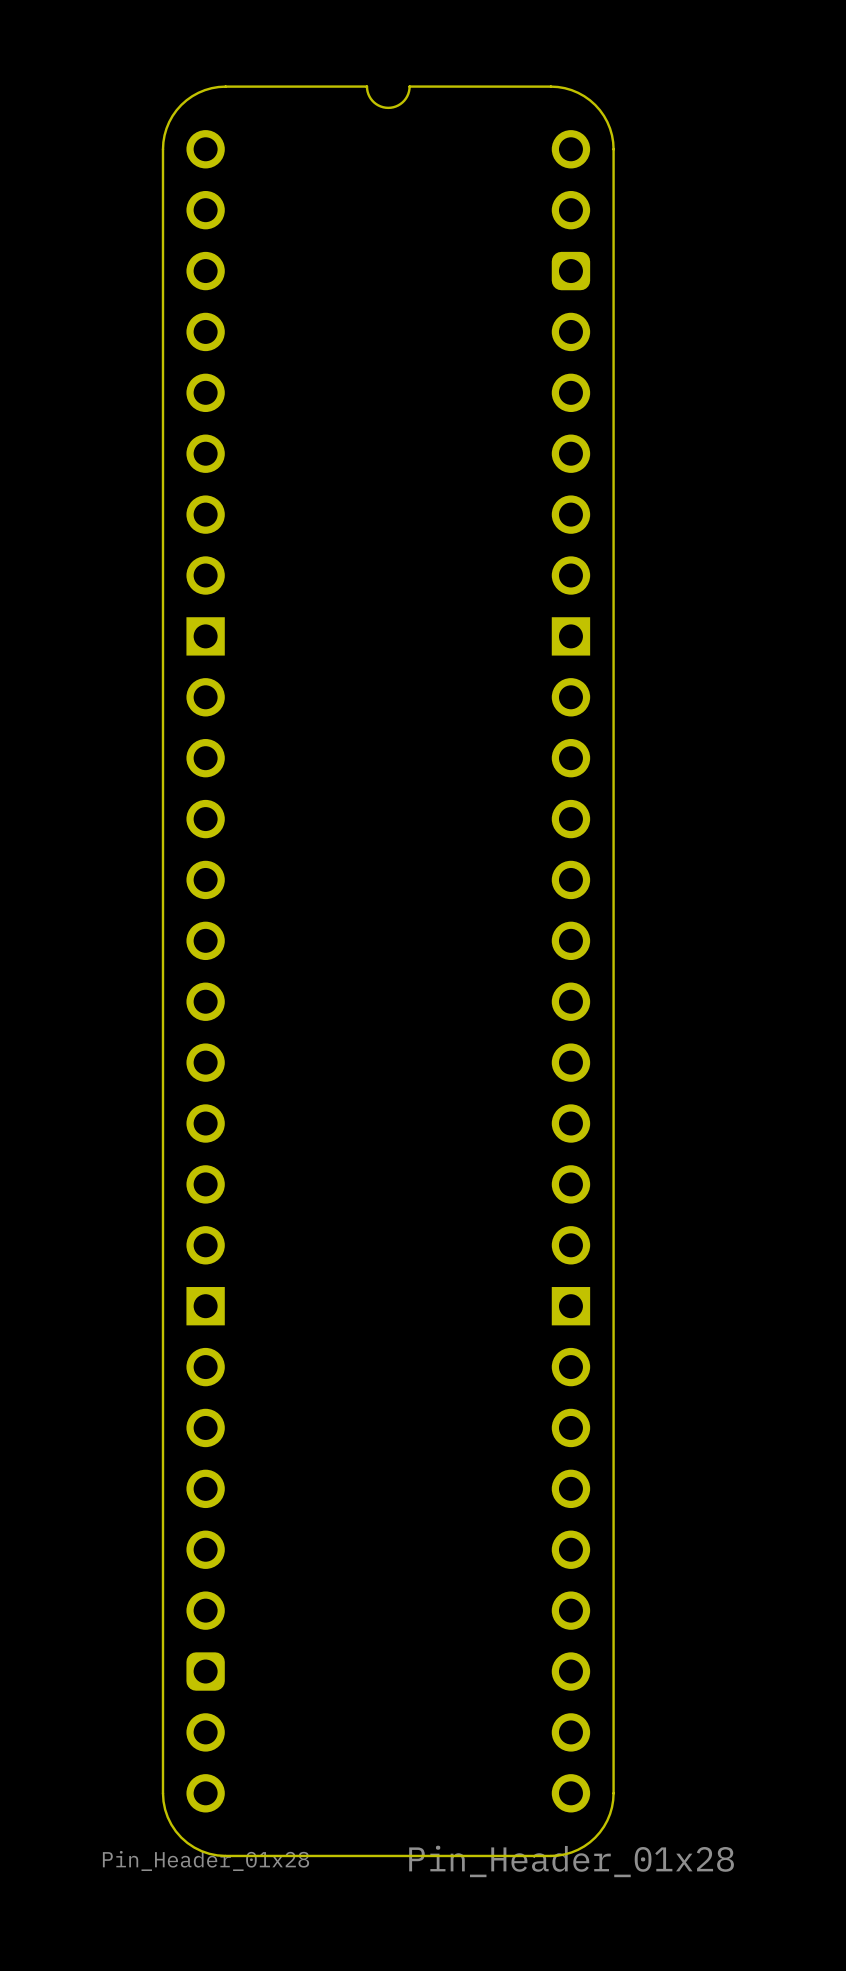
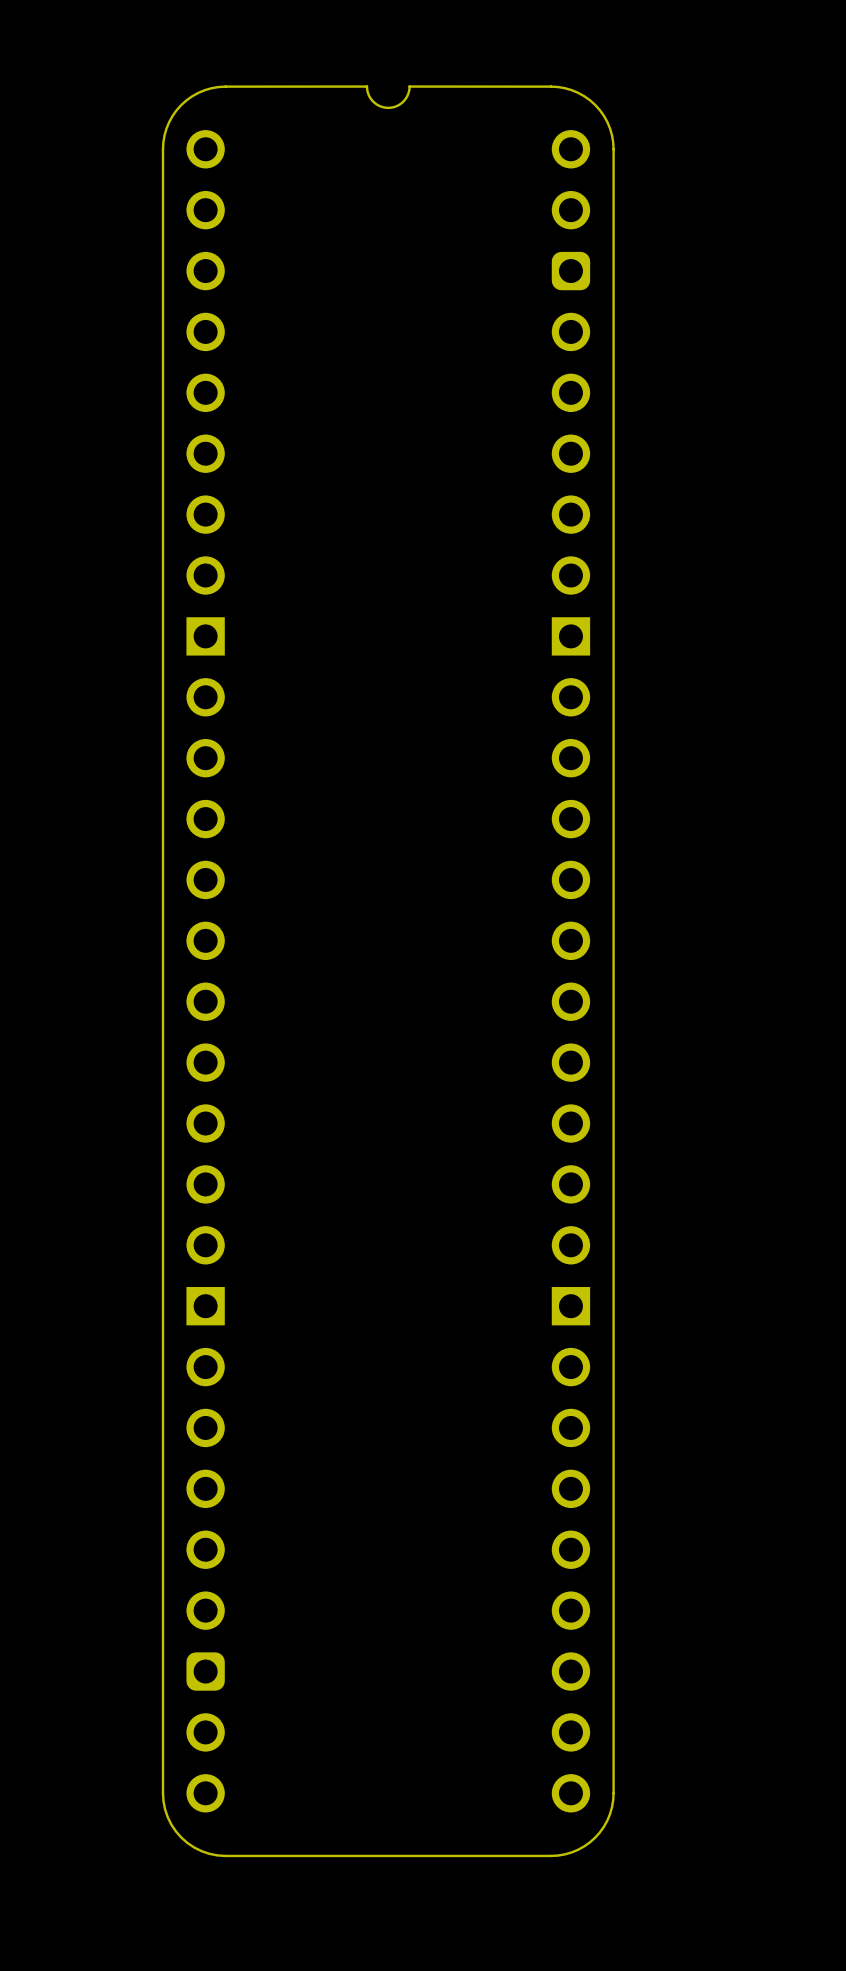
drawing: [409, 1845, 734, 1878] -> none
drawing: [102, 1851, 310, 1872] -> none

